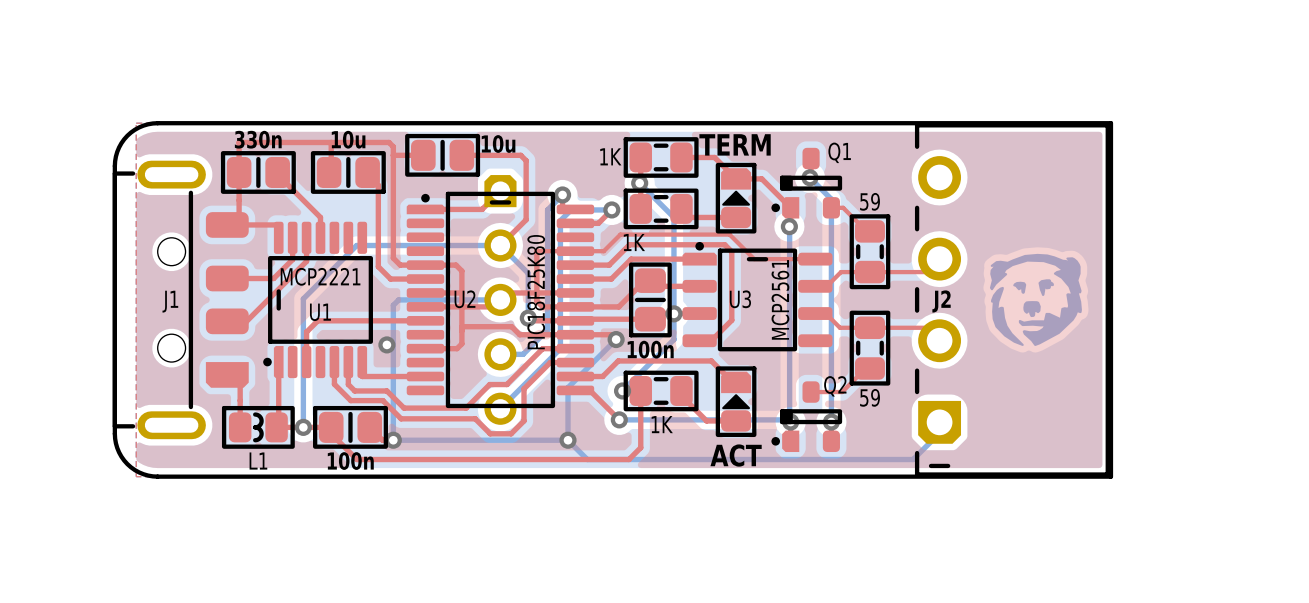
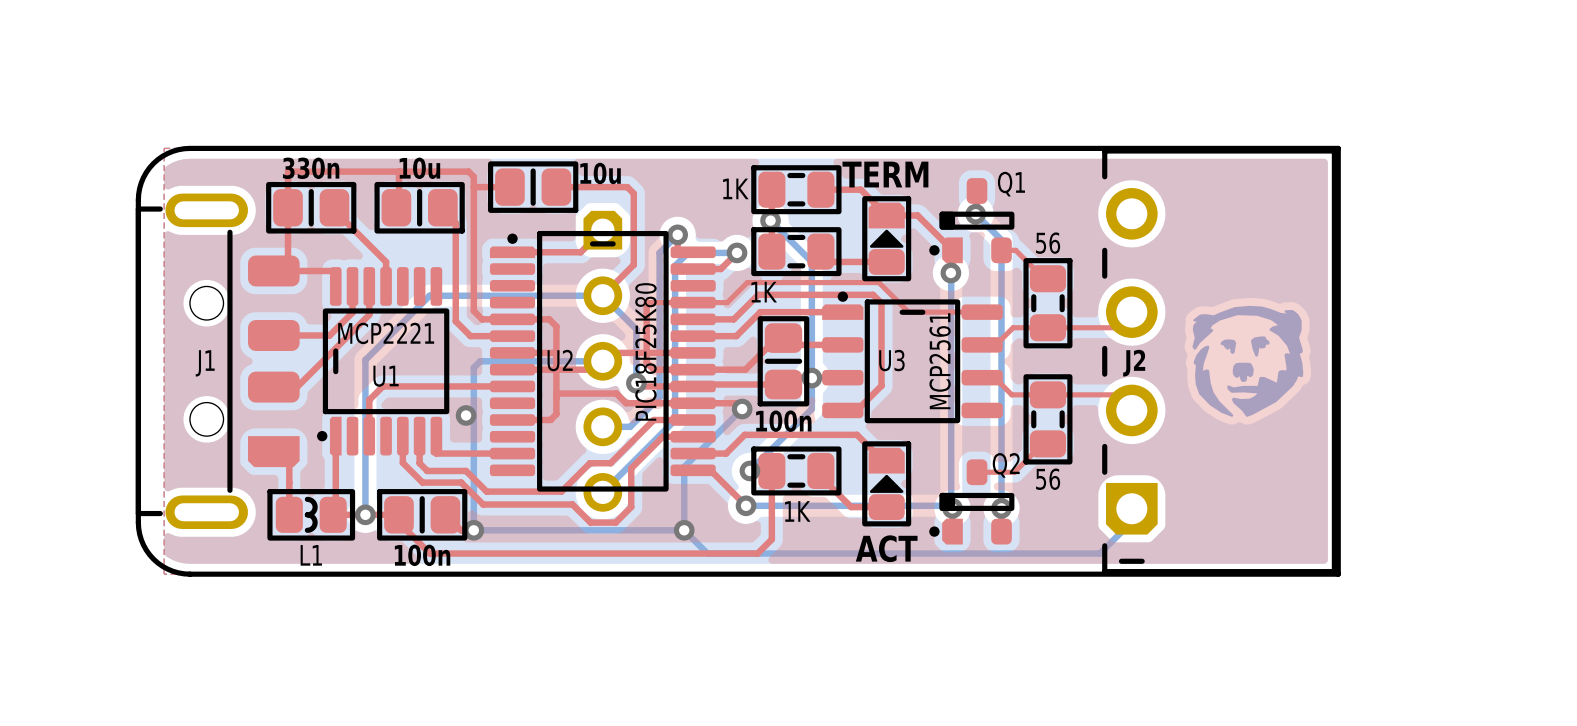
part value: 59 (870, 201) -> 56 (1048, 243)
part value: 59 (870, 397) -> 56 (1048, 479)

